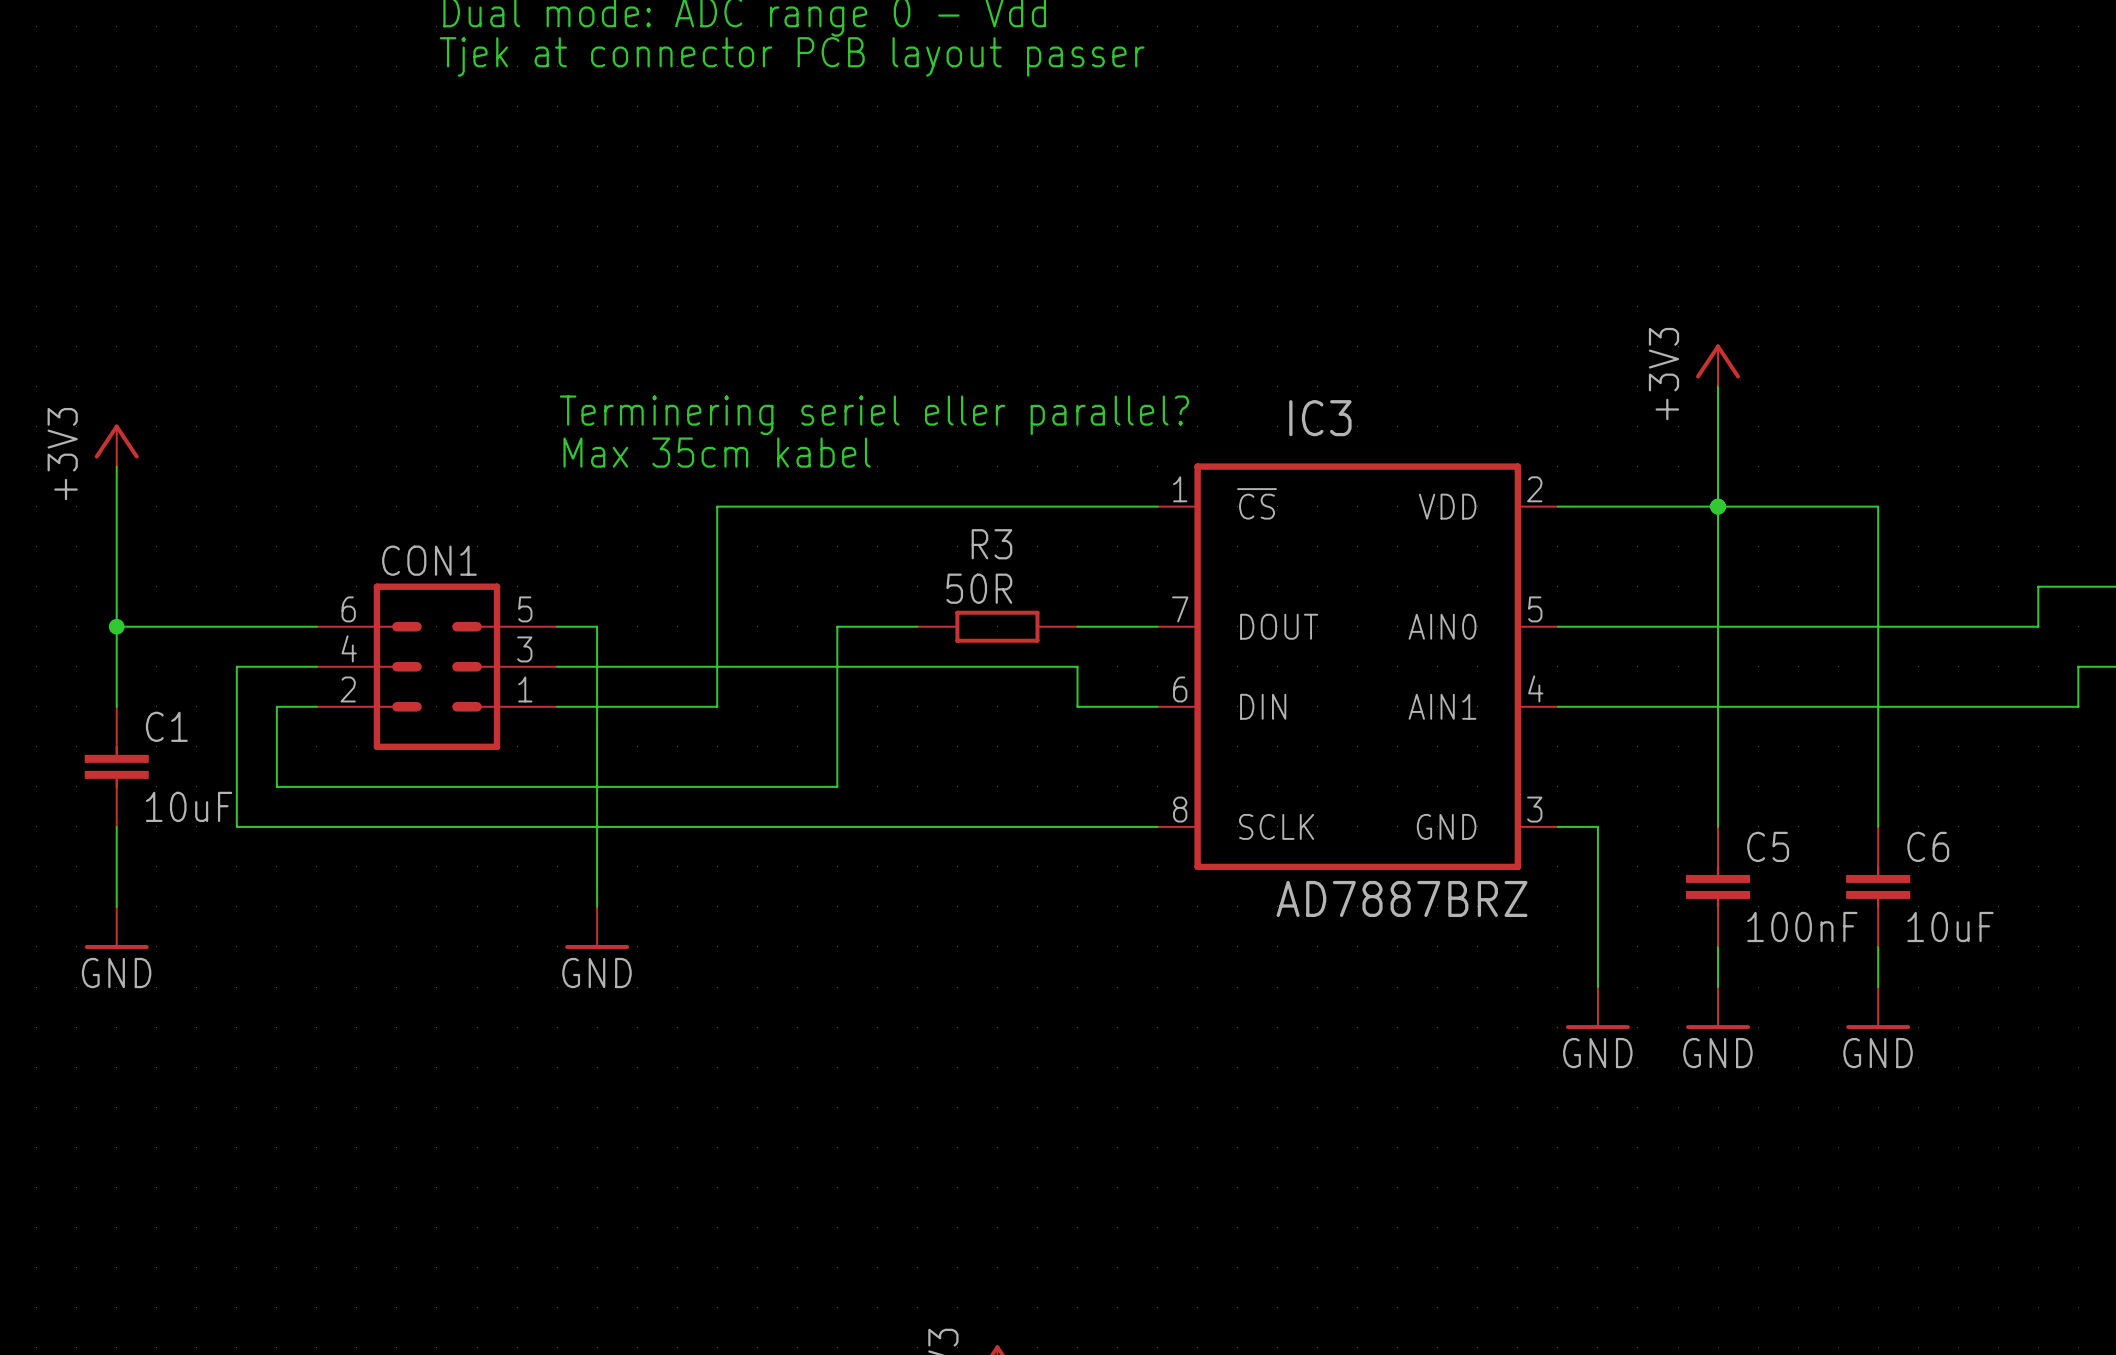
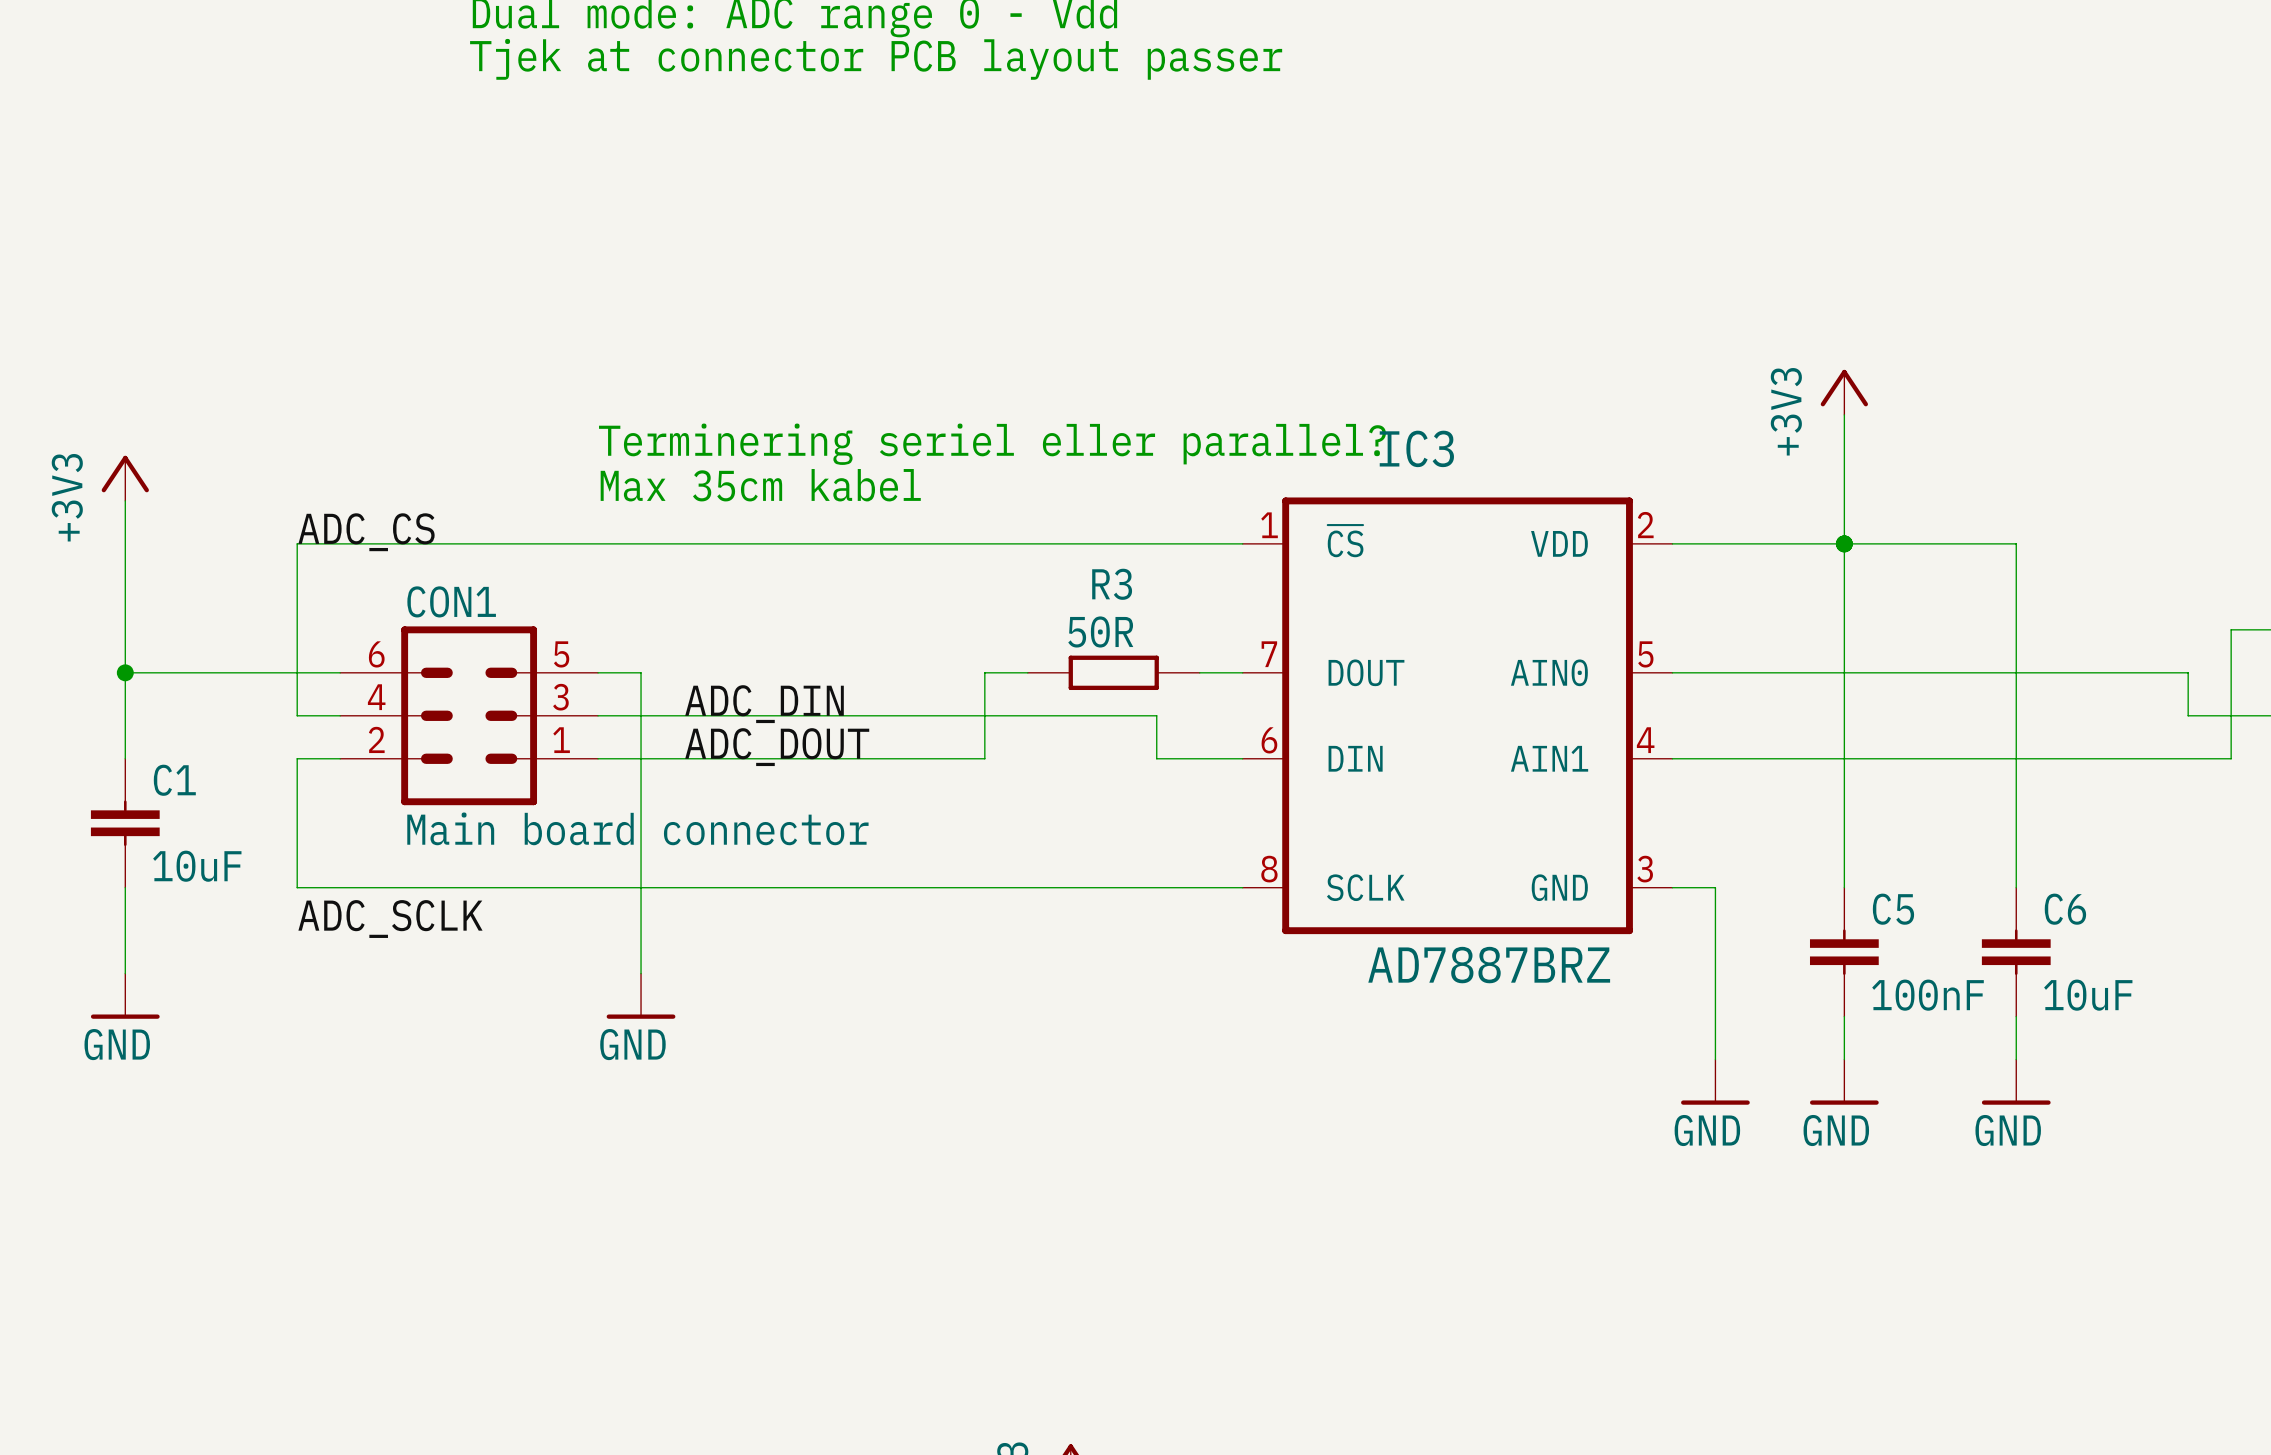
label: none -> ADC_CS (366, 532)
wire: (717, 506) (717, 706) -> (1027, 672) (984, 672) (984, 758) (769, 758)
wire: none -> (769, 543) (297, 543) (297, 715)
wire: (2078, 586) (2038, 586) (2038, 626) -> (2231, 629) (2231, 715) (2188, 715) (2188, 672)
wire: (917, 626) (837, 626) (837, 786) (276, 786) -> none
R3 position: (997, 626) -> (1113, 672)
label: none -> ADC_DIN (764, 704)
wire: (276, 666) (236, 666) (236, 826) (276, 826) -> (297, 844) (297, 887)
label: none -> ADC_DOUT (777, 747)
CON1 value: none -> Main board connector (637, 828)
label: none -> ADC_SCLK (390, 919)

